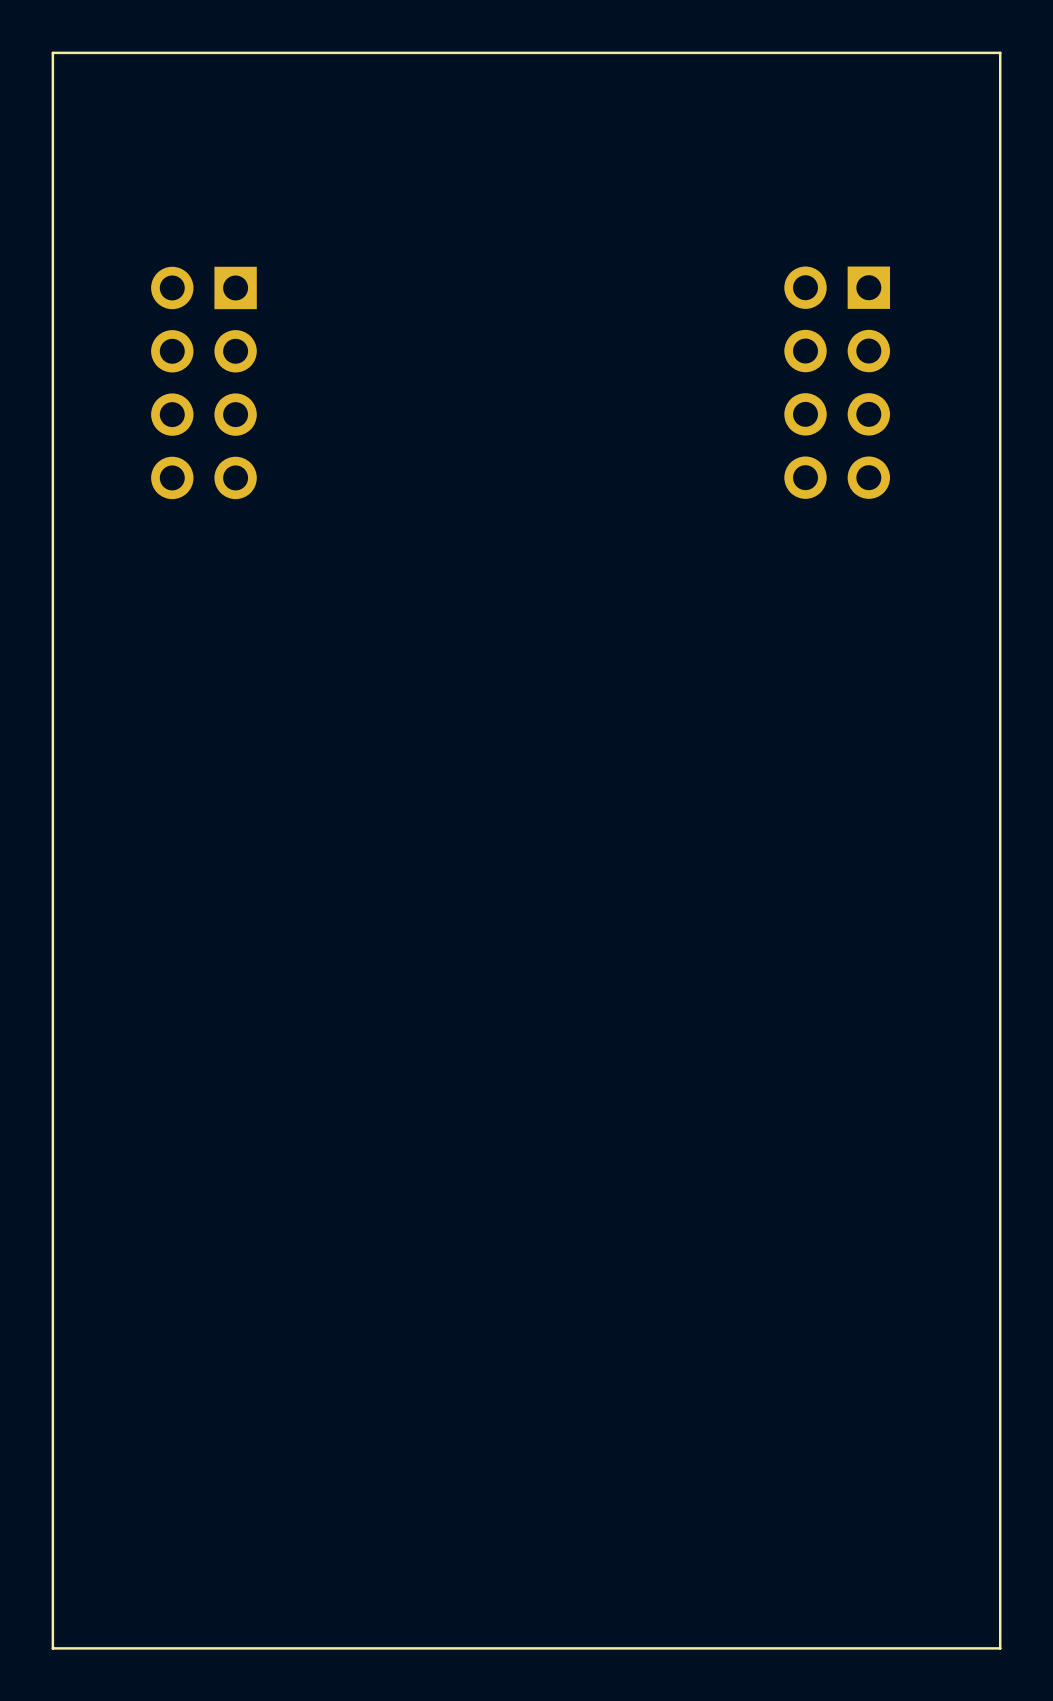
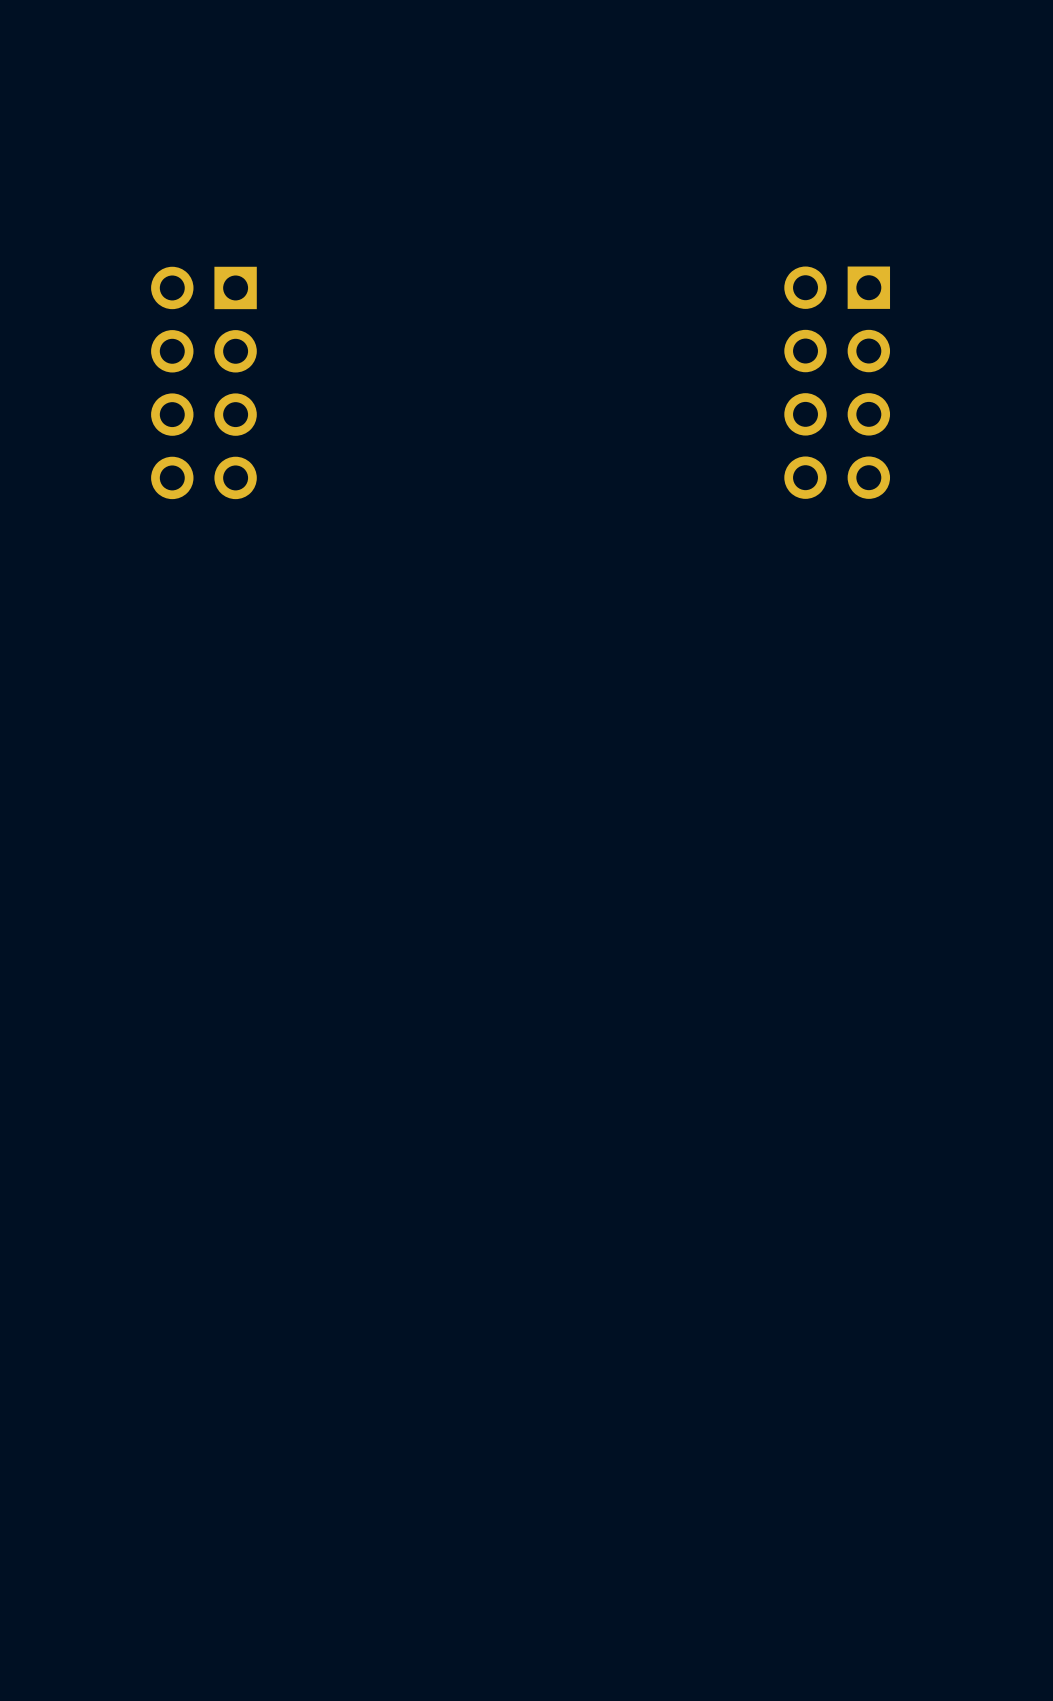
line: (52, 52) (1000, 52) (1000, 1648) (52, 1648) (52, 52) -> none

